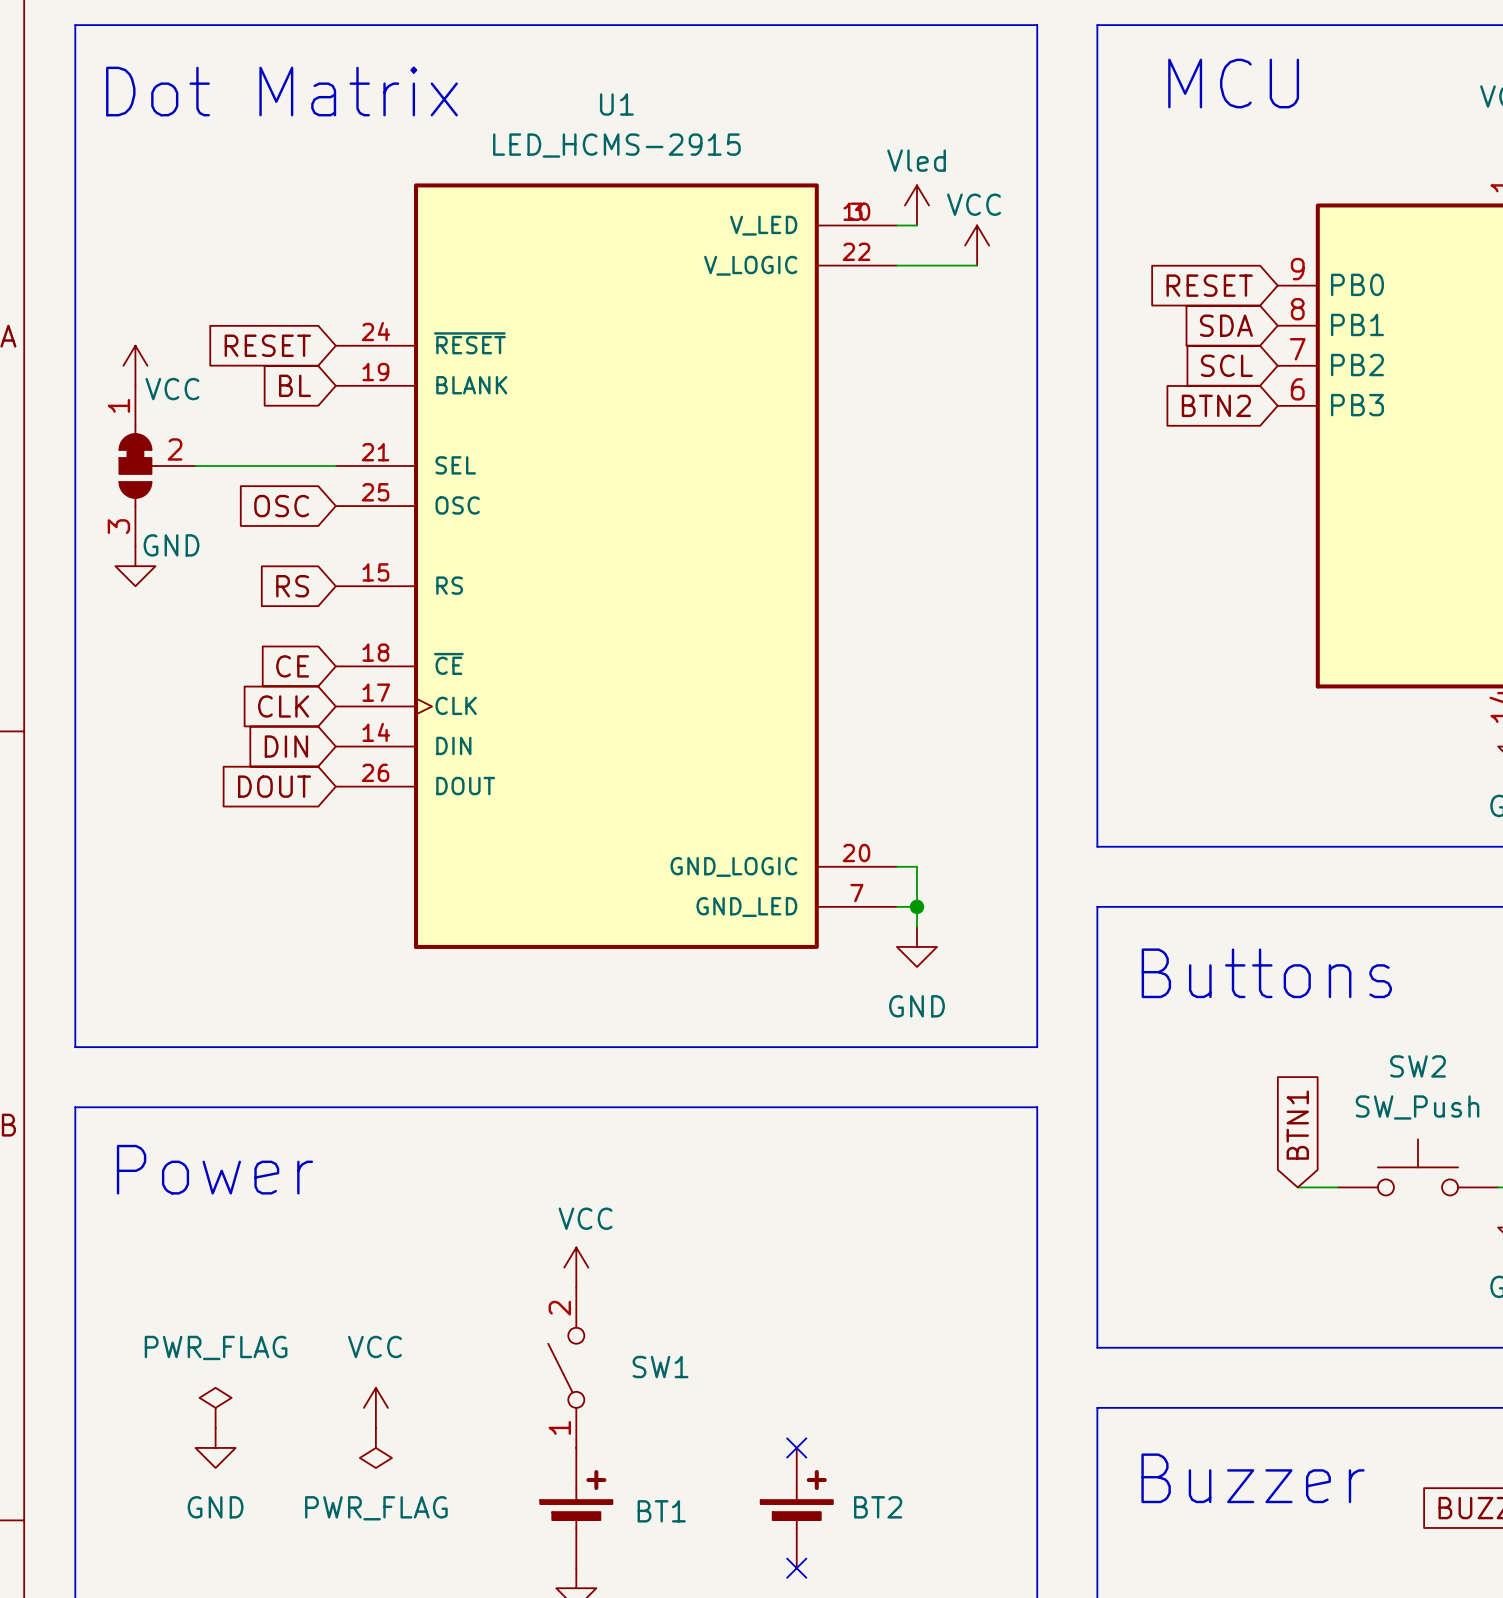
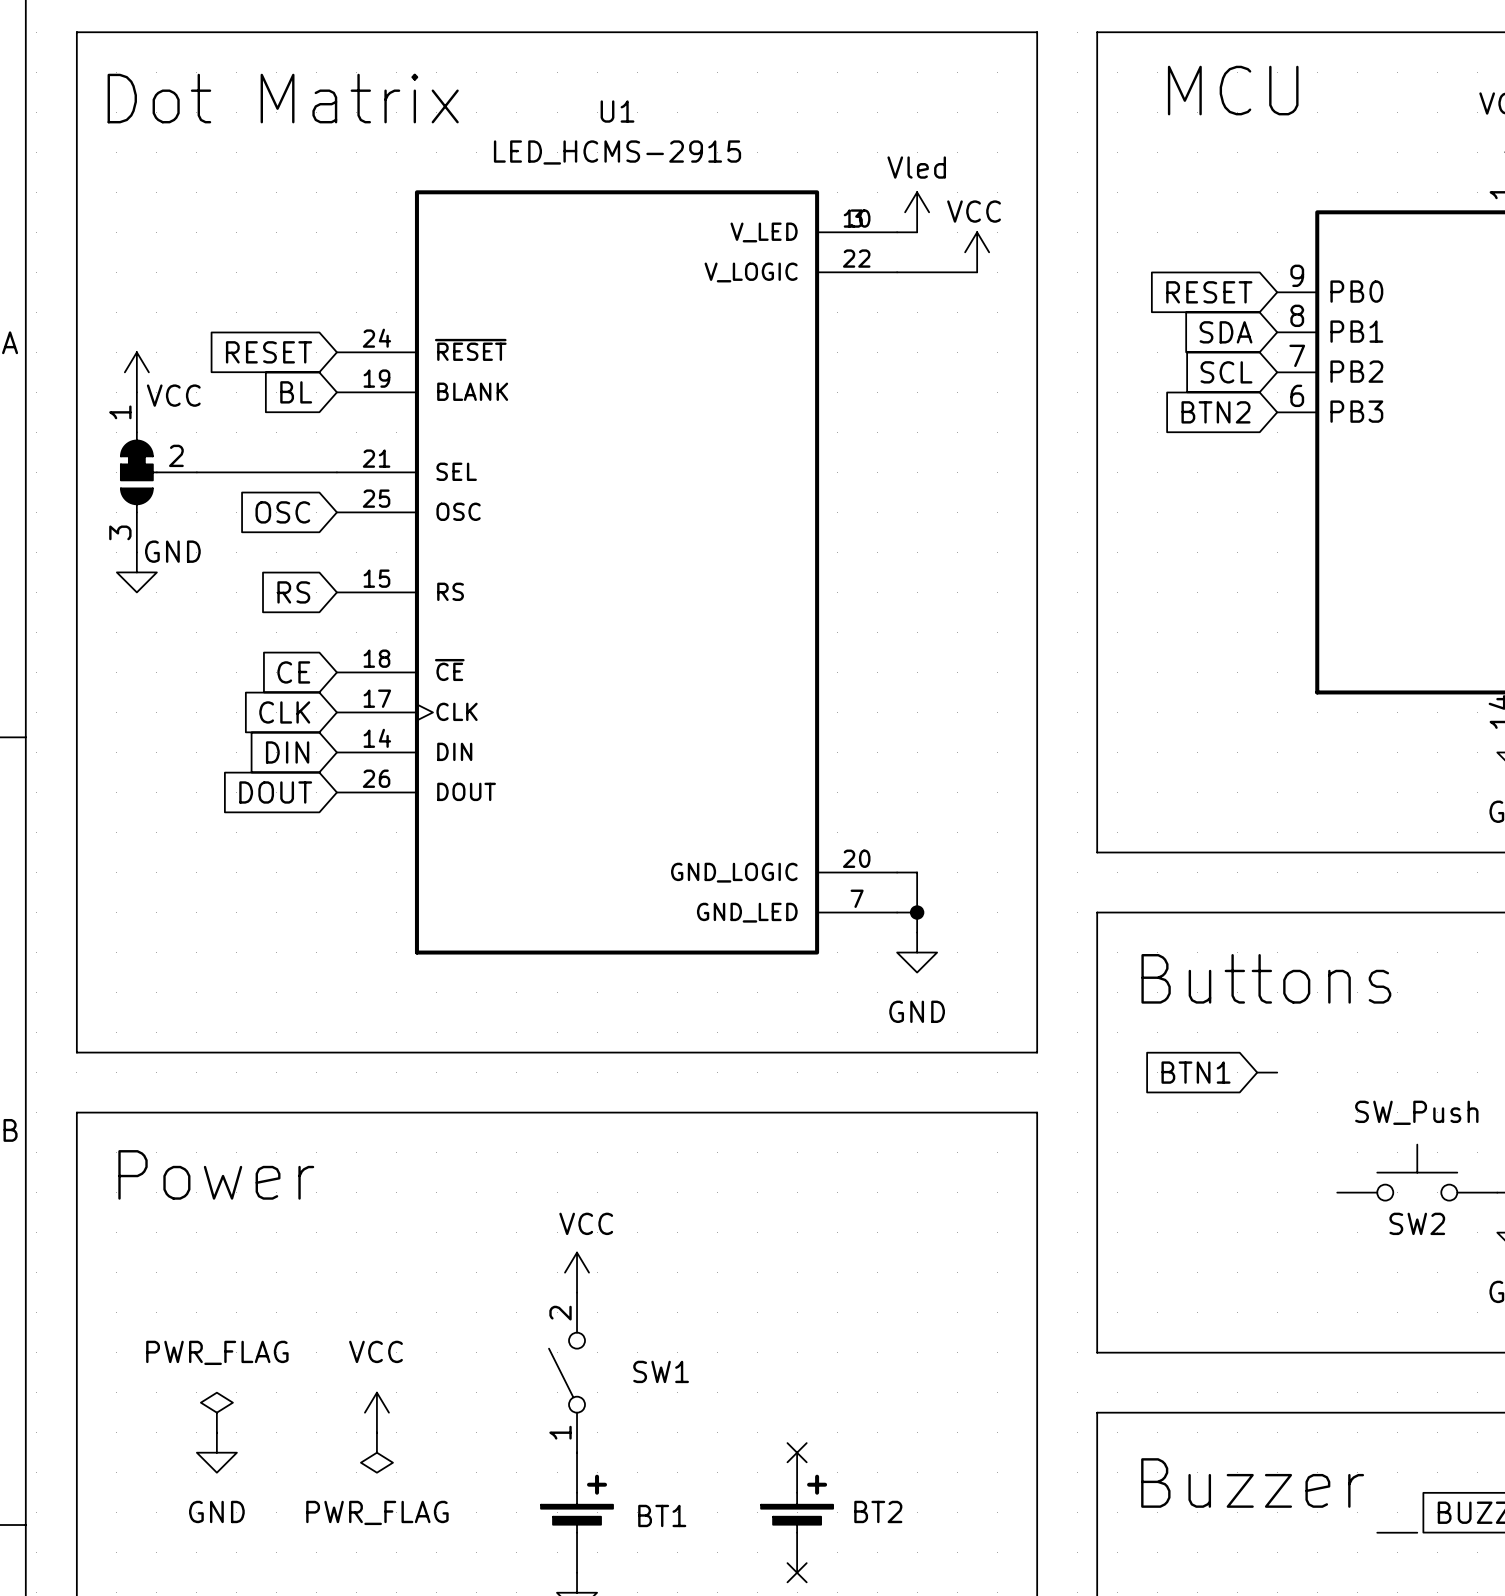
SW2 name position: SW2 (1418, 1066) -> SW2 (1417, 1223)
wire: none -> (1257, 1072) (1277, 1072)
global label rotation: 0° (1297, 1125) -> 90° counterclockwise (1195, 1072)
wire: (1297, 1187) (1337, 1187) -> (1377, 1532) (1417, 1532)

